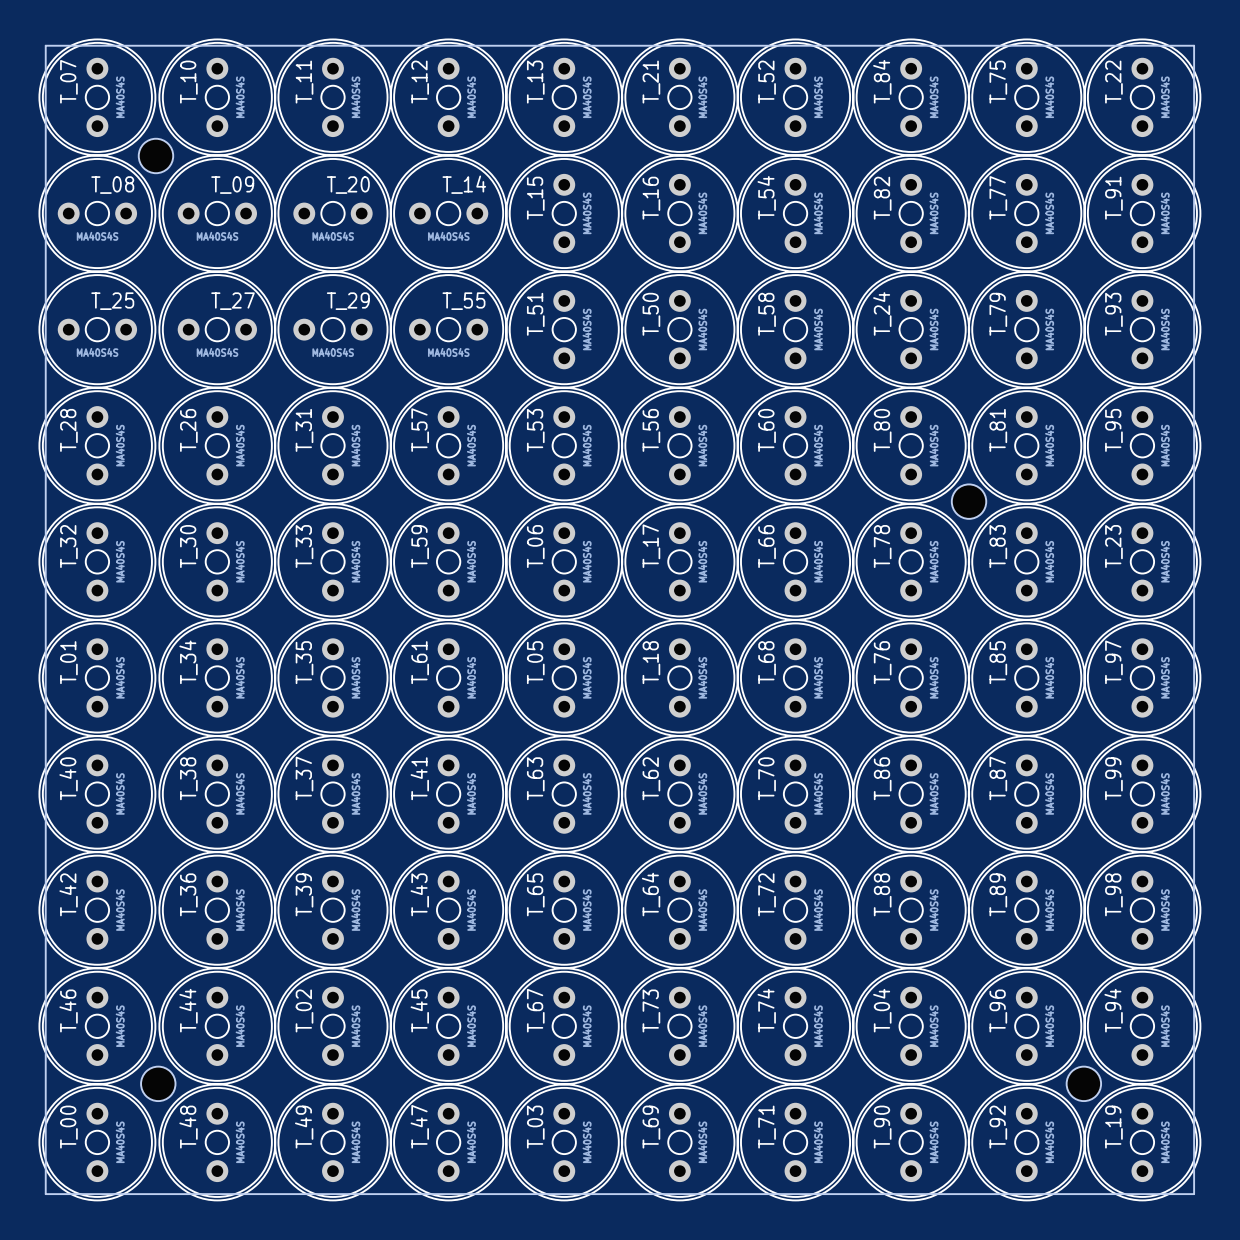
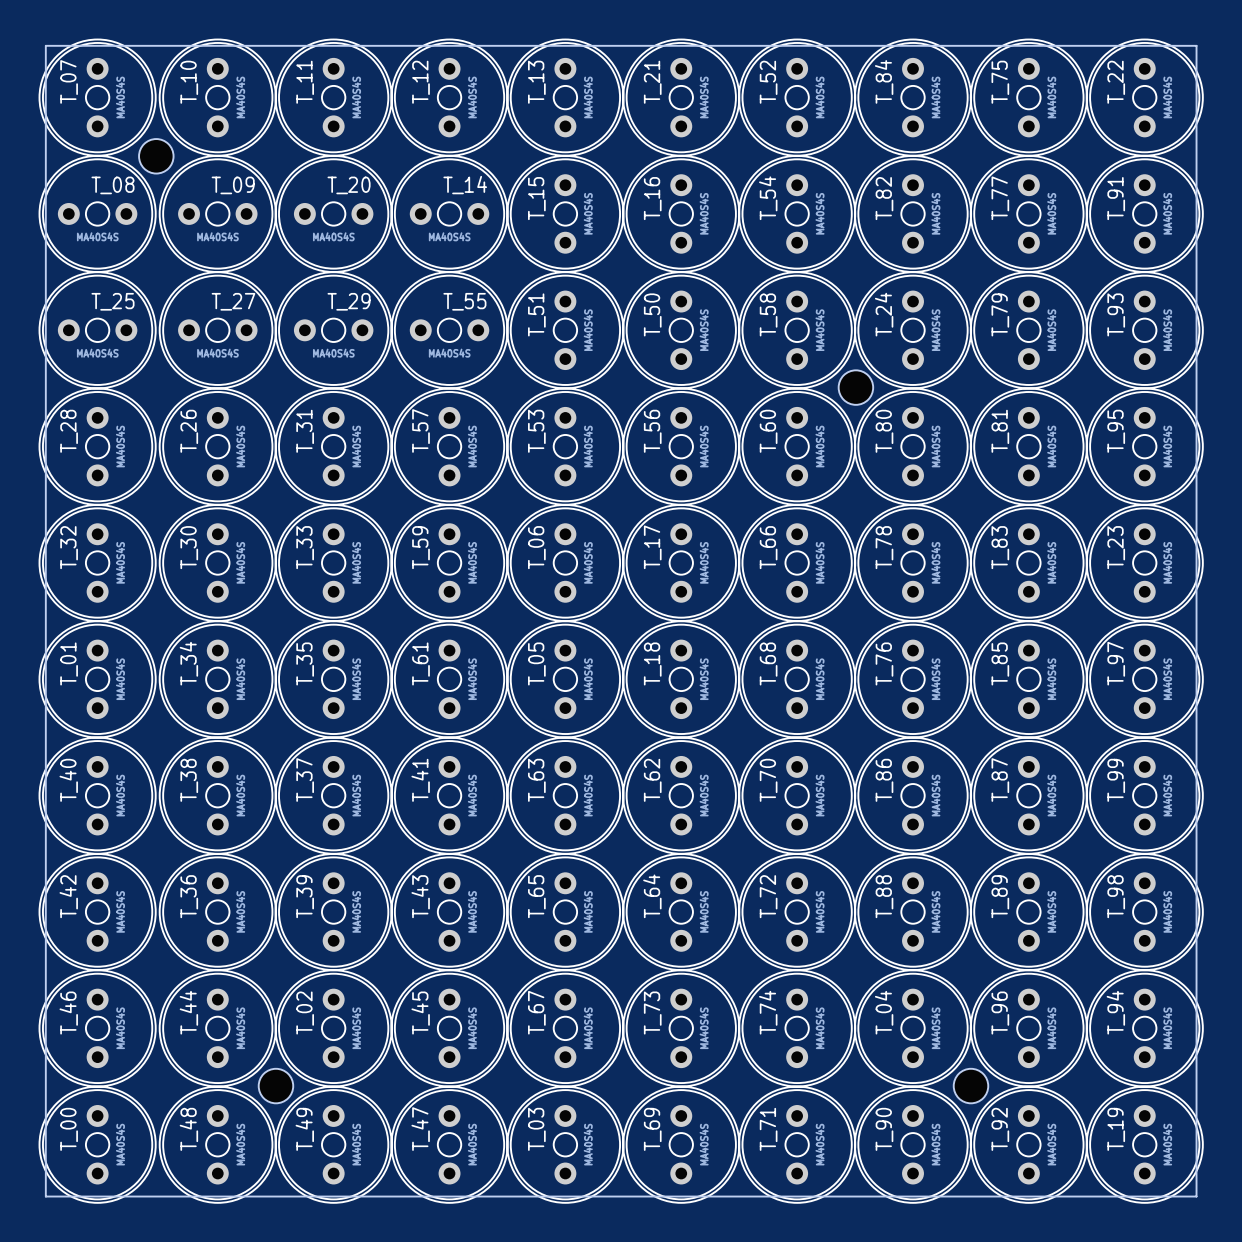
hole position: (969, 501) -> (855, 387)
hole position: (158, 1083) -> (275, 1086)
hole position: (1083, 1083) -> (970, 1086)

